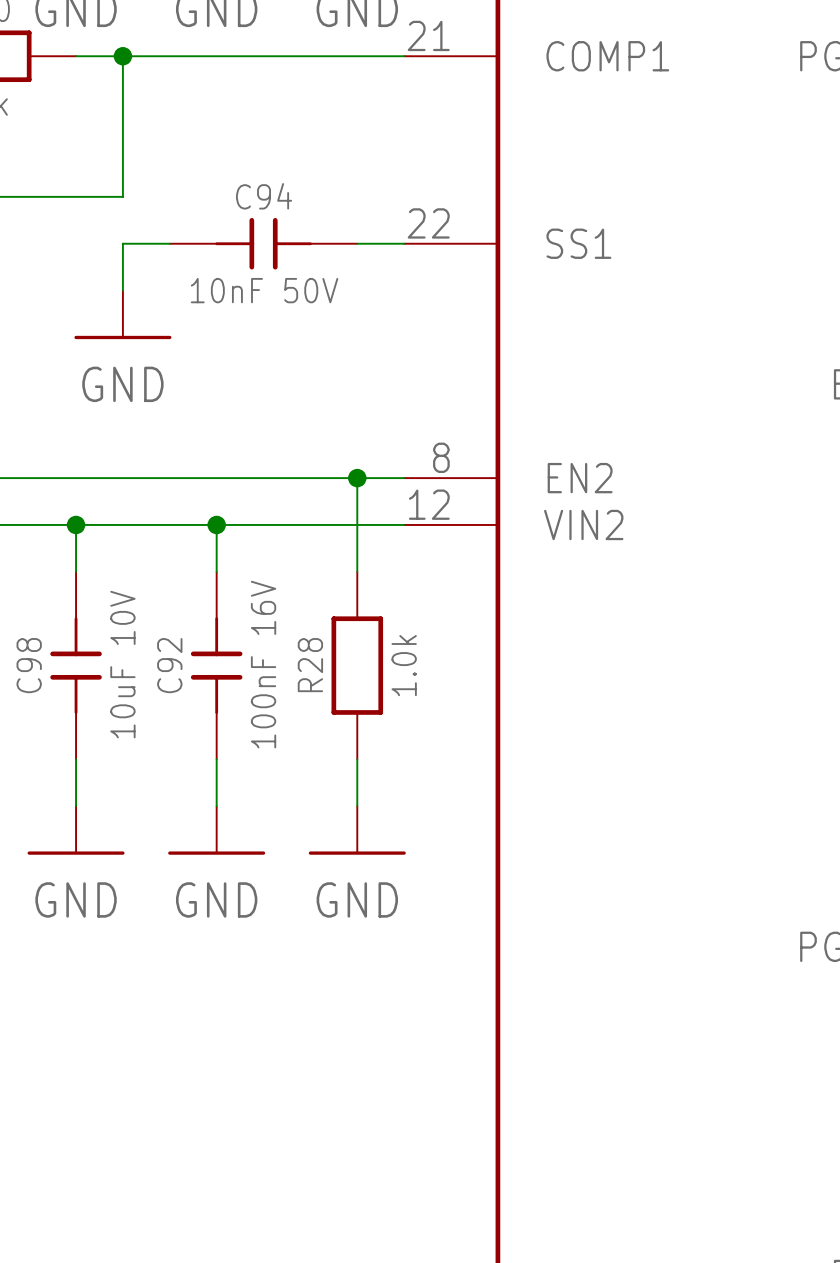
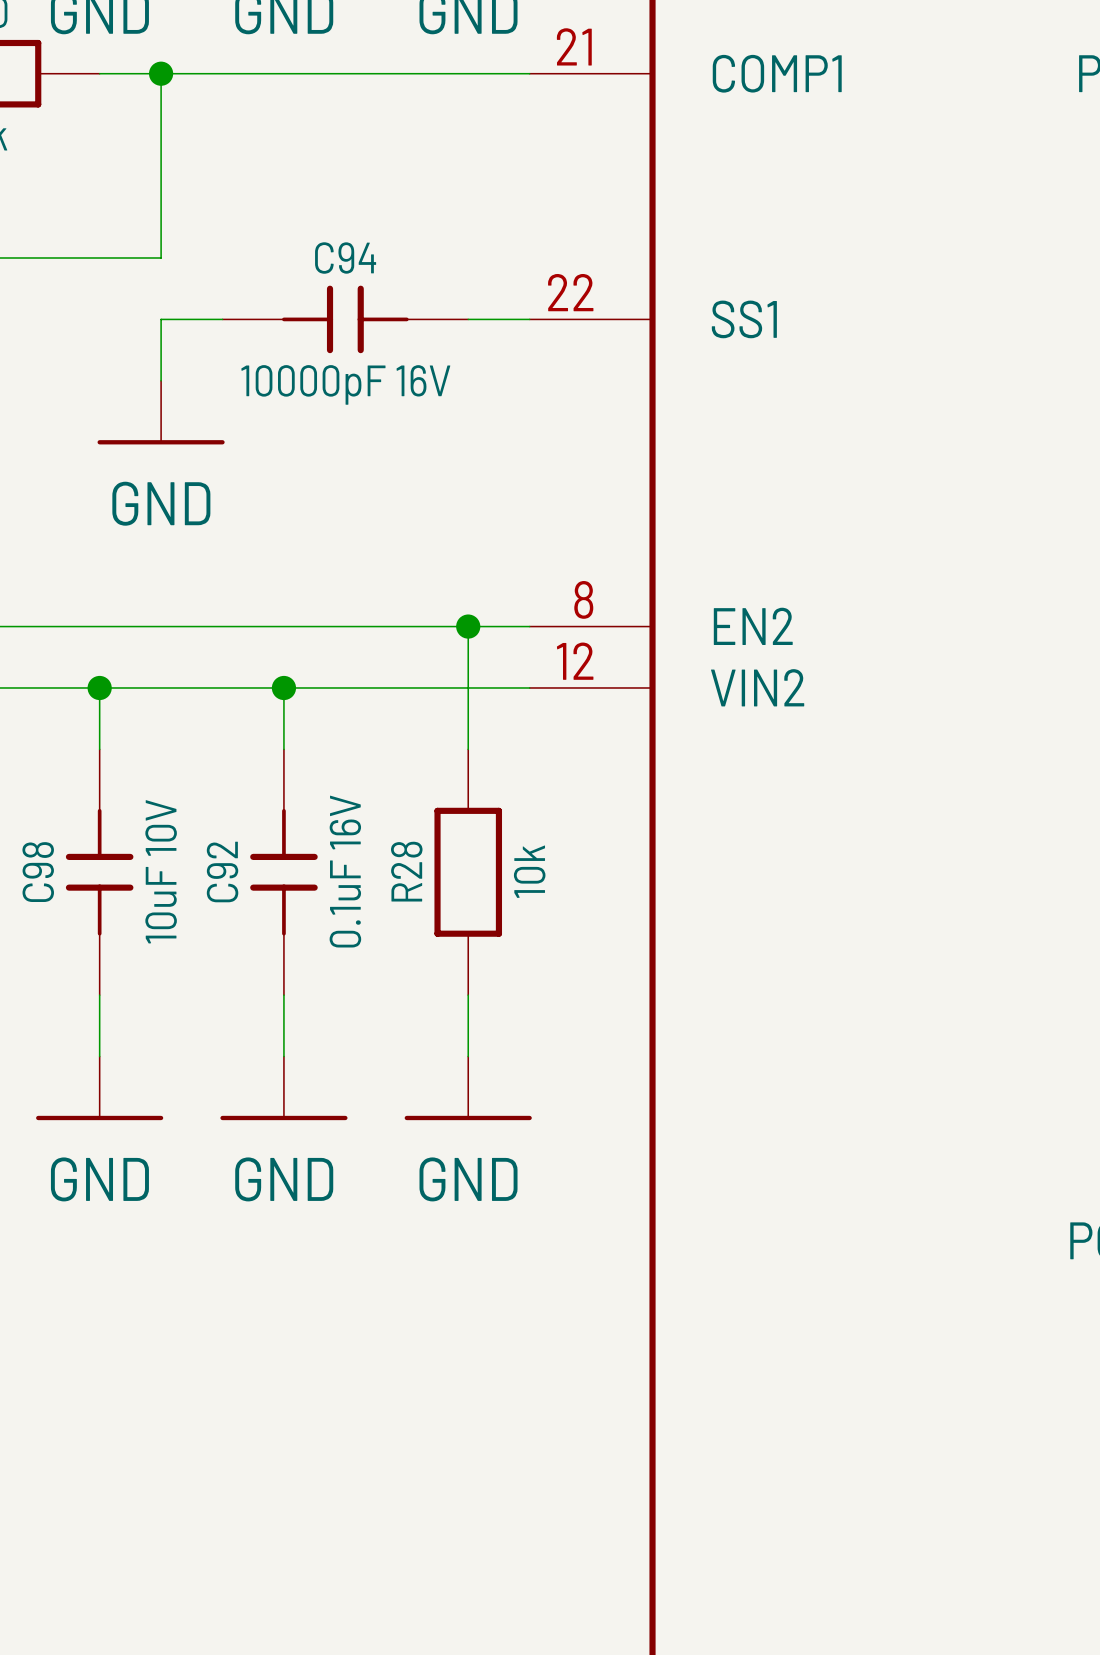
C94 value: 10nF 50V (264, 290) -> 10000pF 16V (345, 384)
C92 value: 100nF 16V (263, 664) -> 0.1uF 16V (345, 871)
R28 value: 1.0k (404, 665) -> 10k (529, 871)

